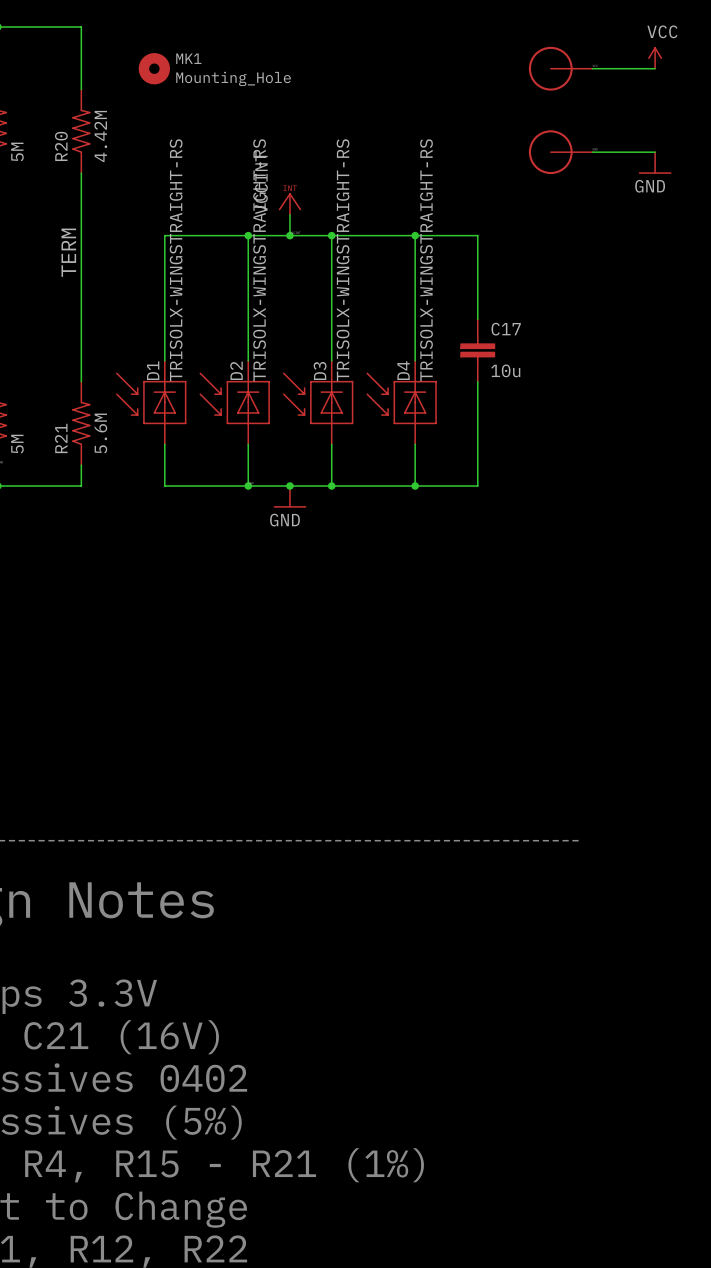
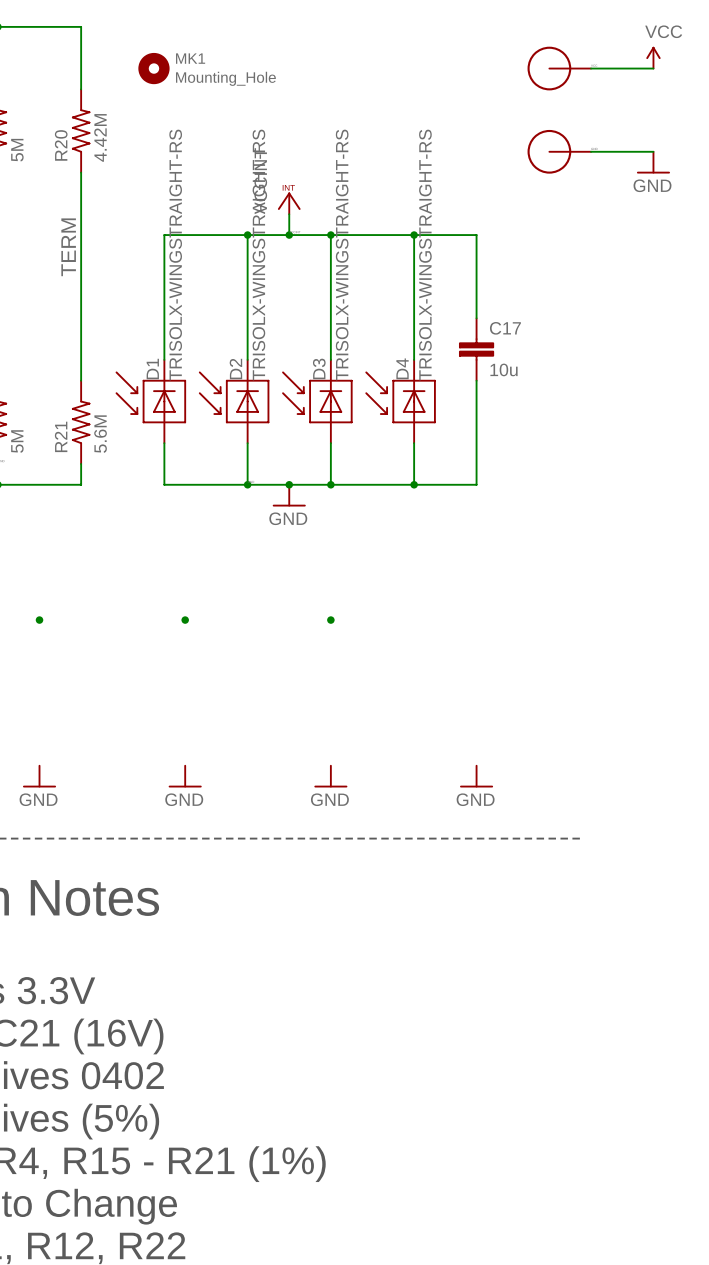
junction: none -> (39, 620)
junction: none -> (185, 620)
junction: none -> (330, 620)
power symbol: none -> GND (39, 776)
power symbol: none -> GND (185, 776)
power symbol: none -> GND (330, 776)
power symbol: none -> GND (476, 776)

